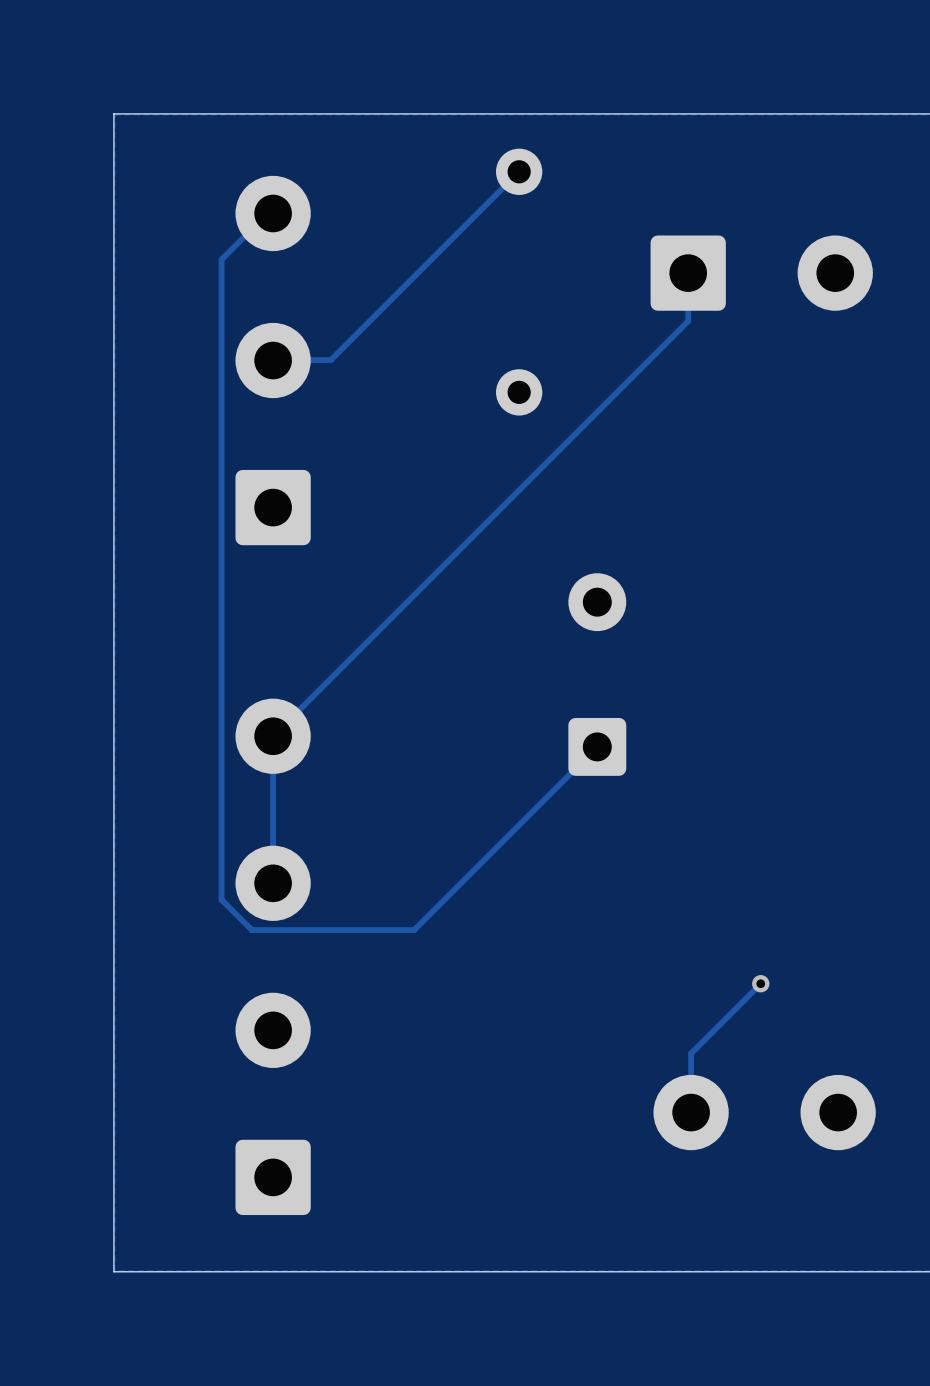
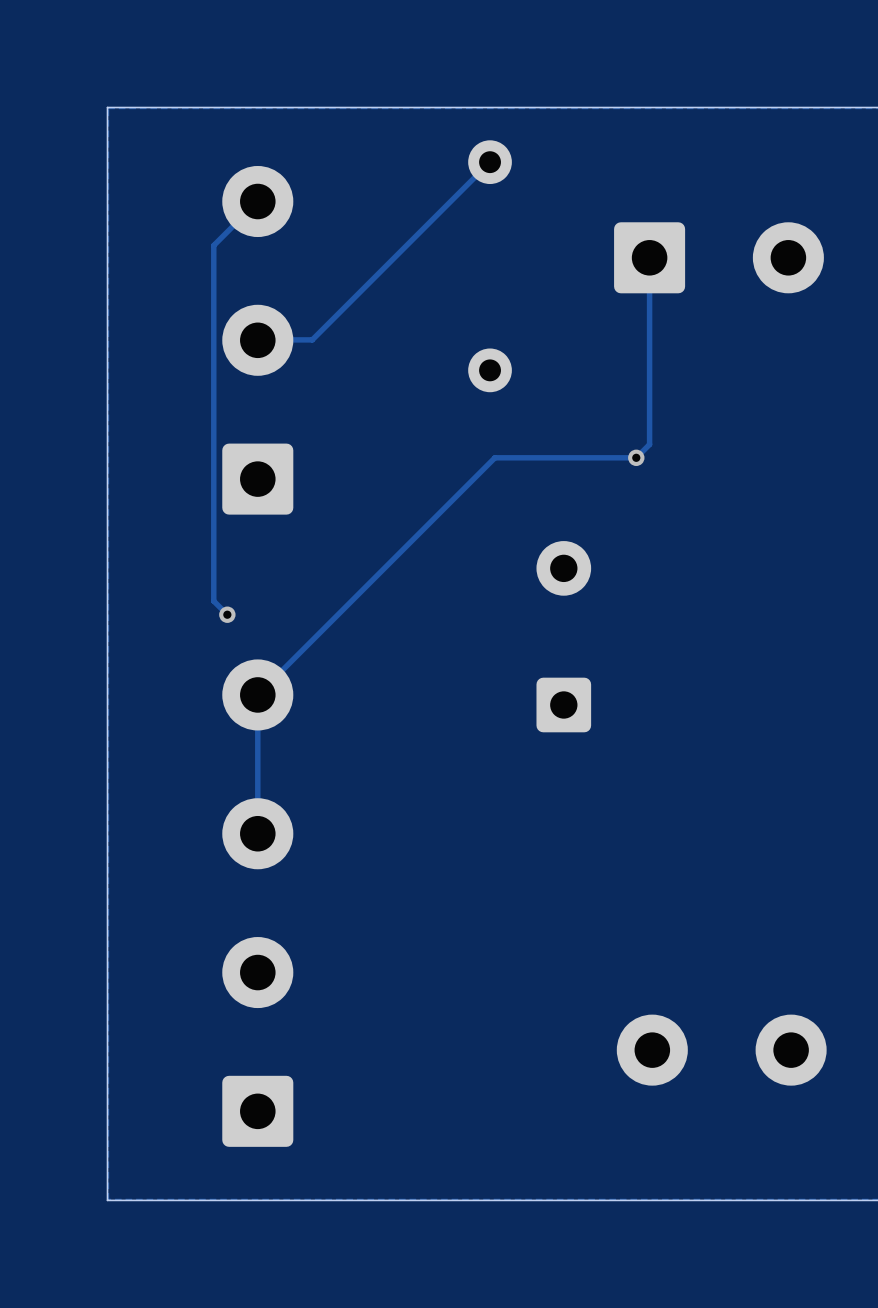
track: (268, 213) (221, 259) (221, 899) (251, 930) (414, 930) (597, 746) -> none
track: none -> (257, 201) (213, 245) (213, 601) (227, 614)
track: (688, 321) (524, 485) -> (649, 303) (649, 444) (636, 457) (494, 457)
via: none -> (636, 457)
via: none -> (227, 614)
track: (760, 983) (691, 1053) (691, 1112) -> none
via: (760, 983) -> none

